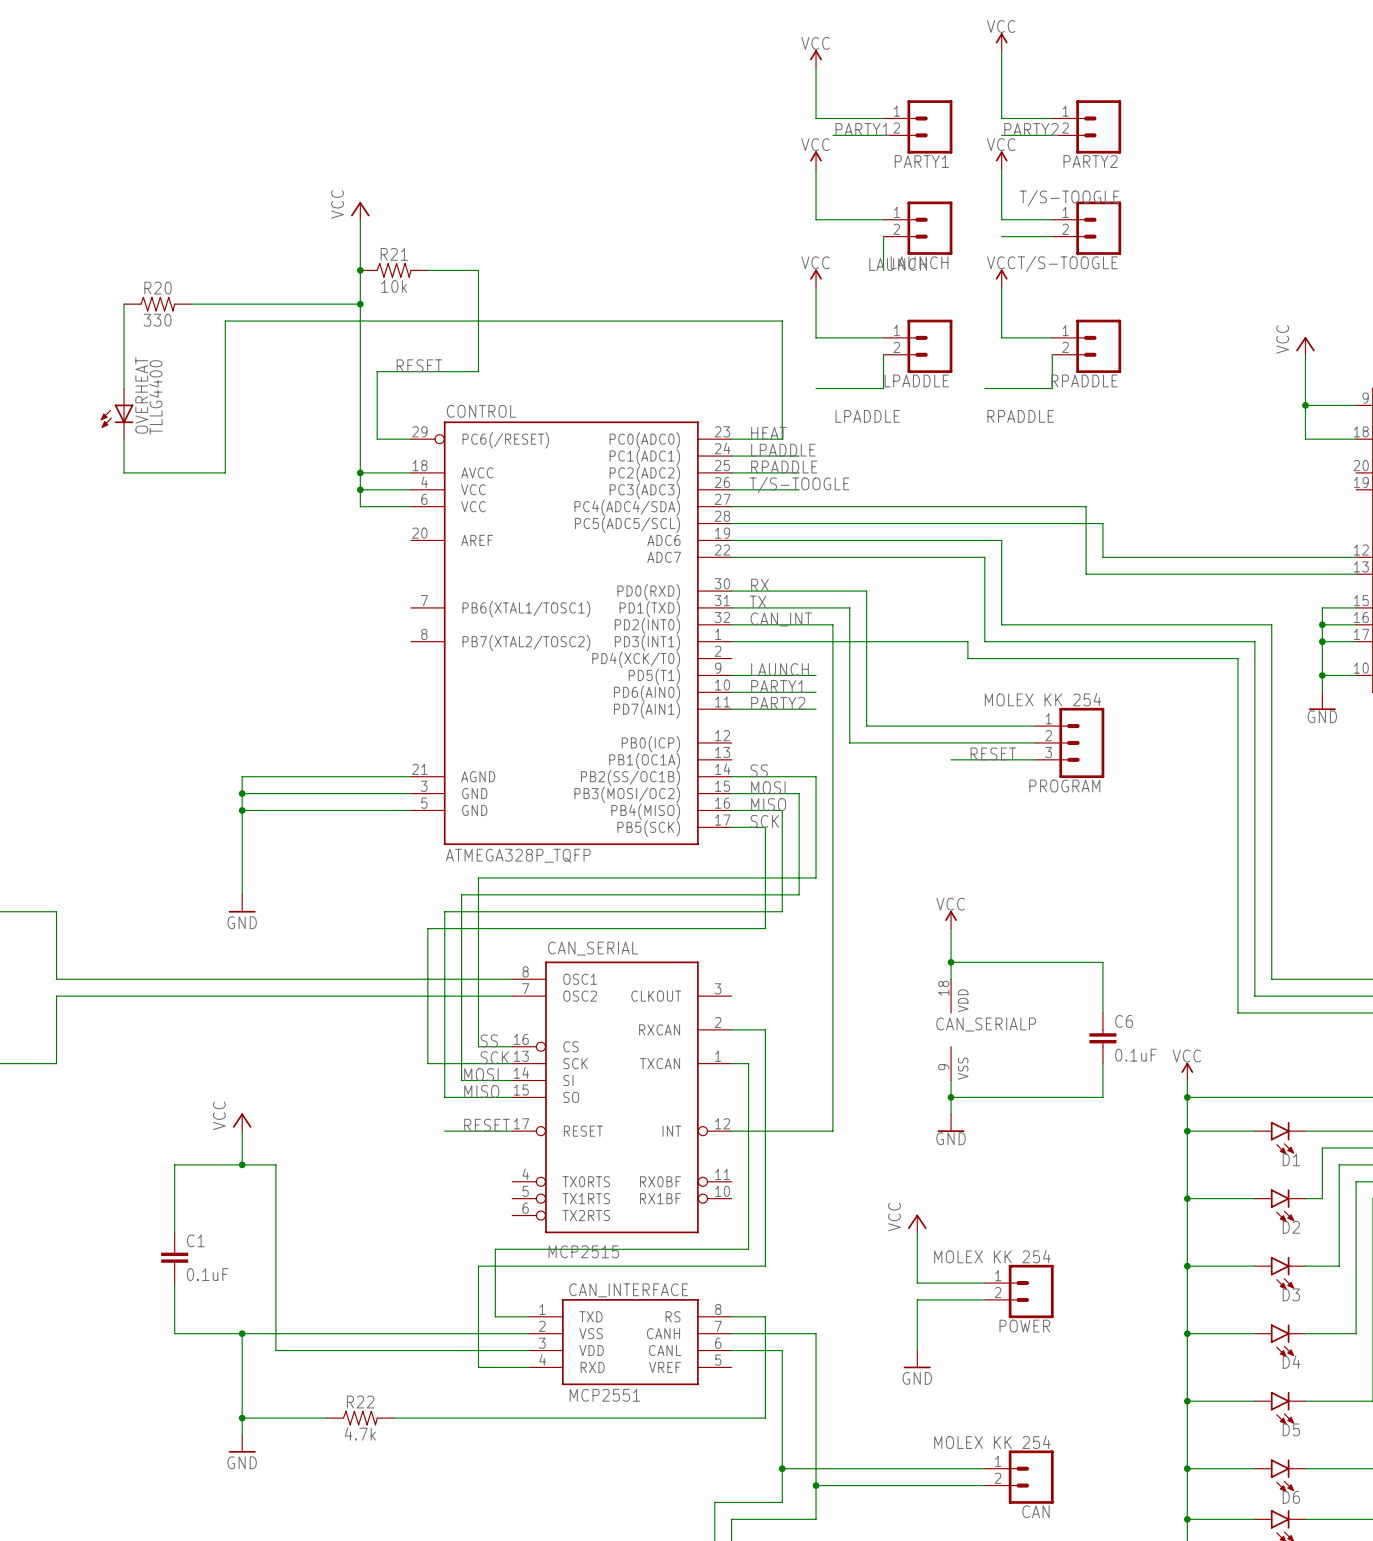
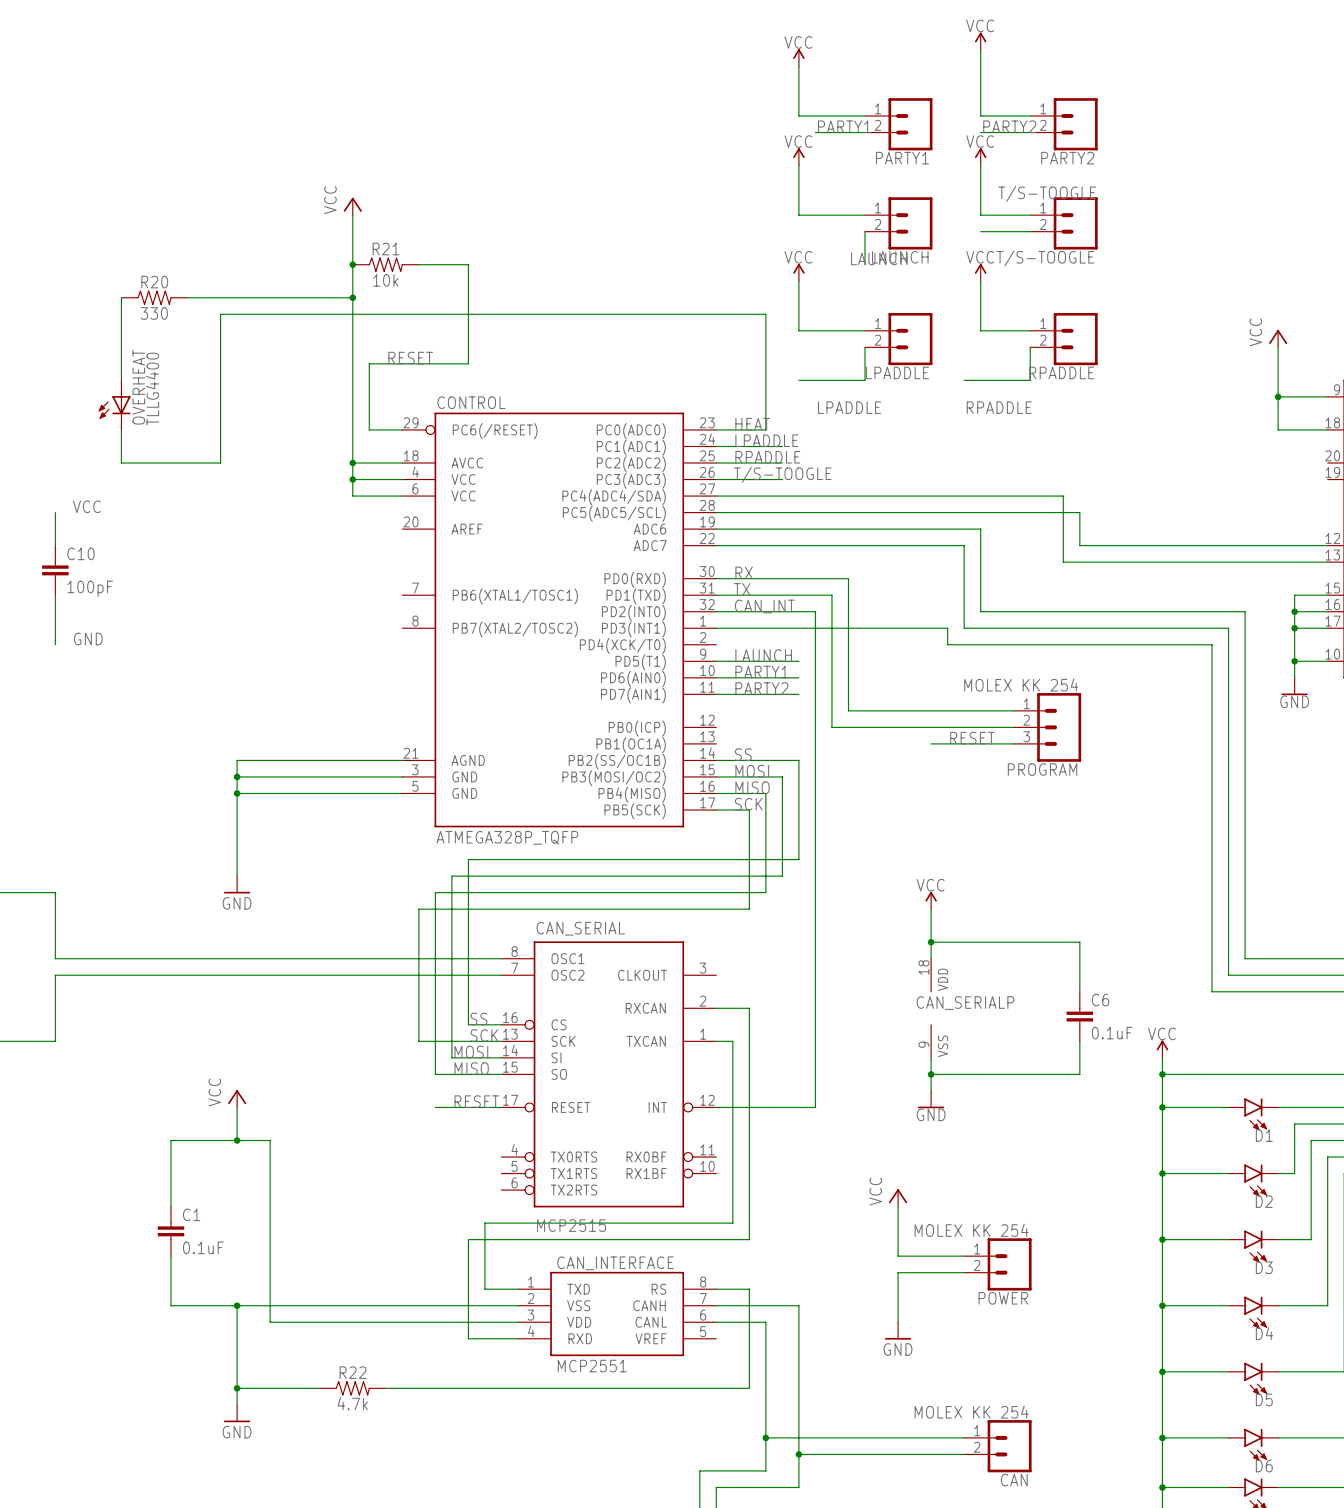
label: none -> VCC (86, 506)
wire: none -> (55, 512) (55, 545)
C10: none -> 100pF (55, 570)
wire: none -> (55, 595) (55, 644)
label: none -> GND (88, 638)

